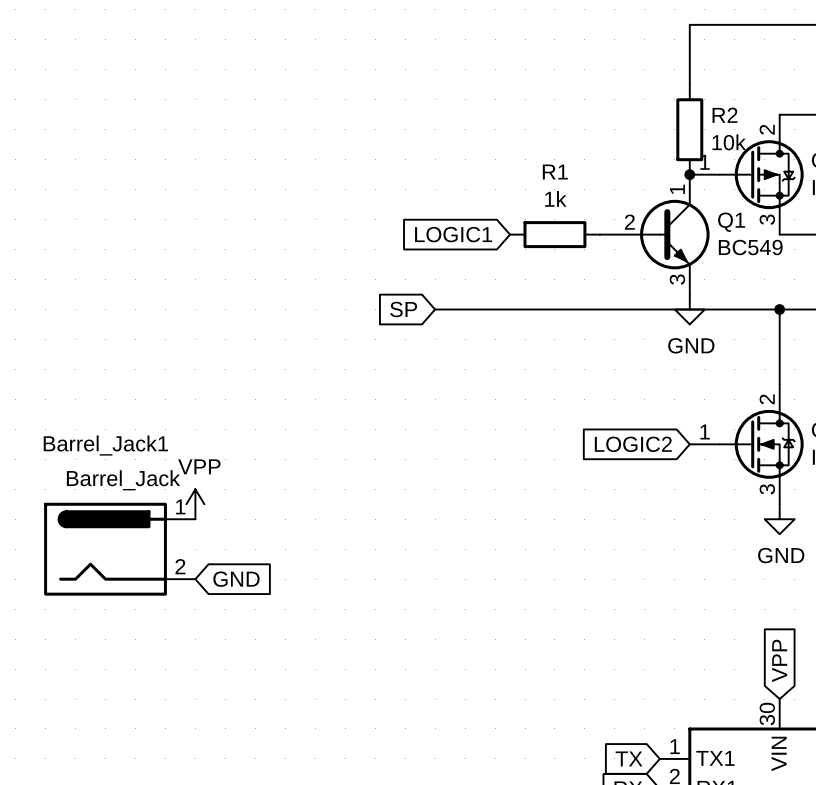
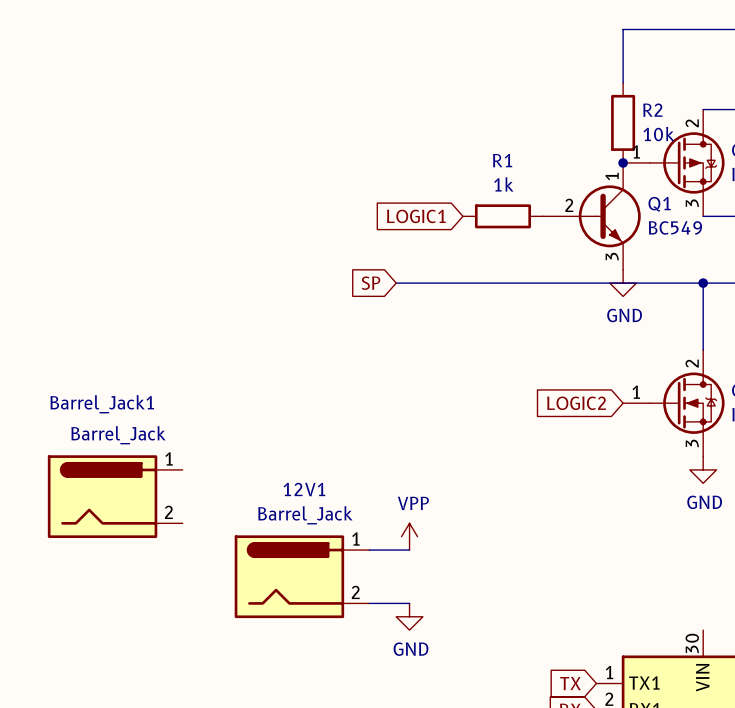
power symbol position: VPP (195, 504) -> VPP (409, 536)
global label: GND (236, 579) -> none
wire: none -> (369, 550) (409, 550)
12V1: none -> Barrel_Jack (302, 576)
global label: VPP (779, 660) -> none
wire: none -> (369, 603) (409, 603)
power symbol: none -> GND (409, 616)

